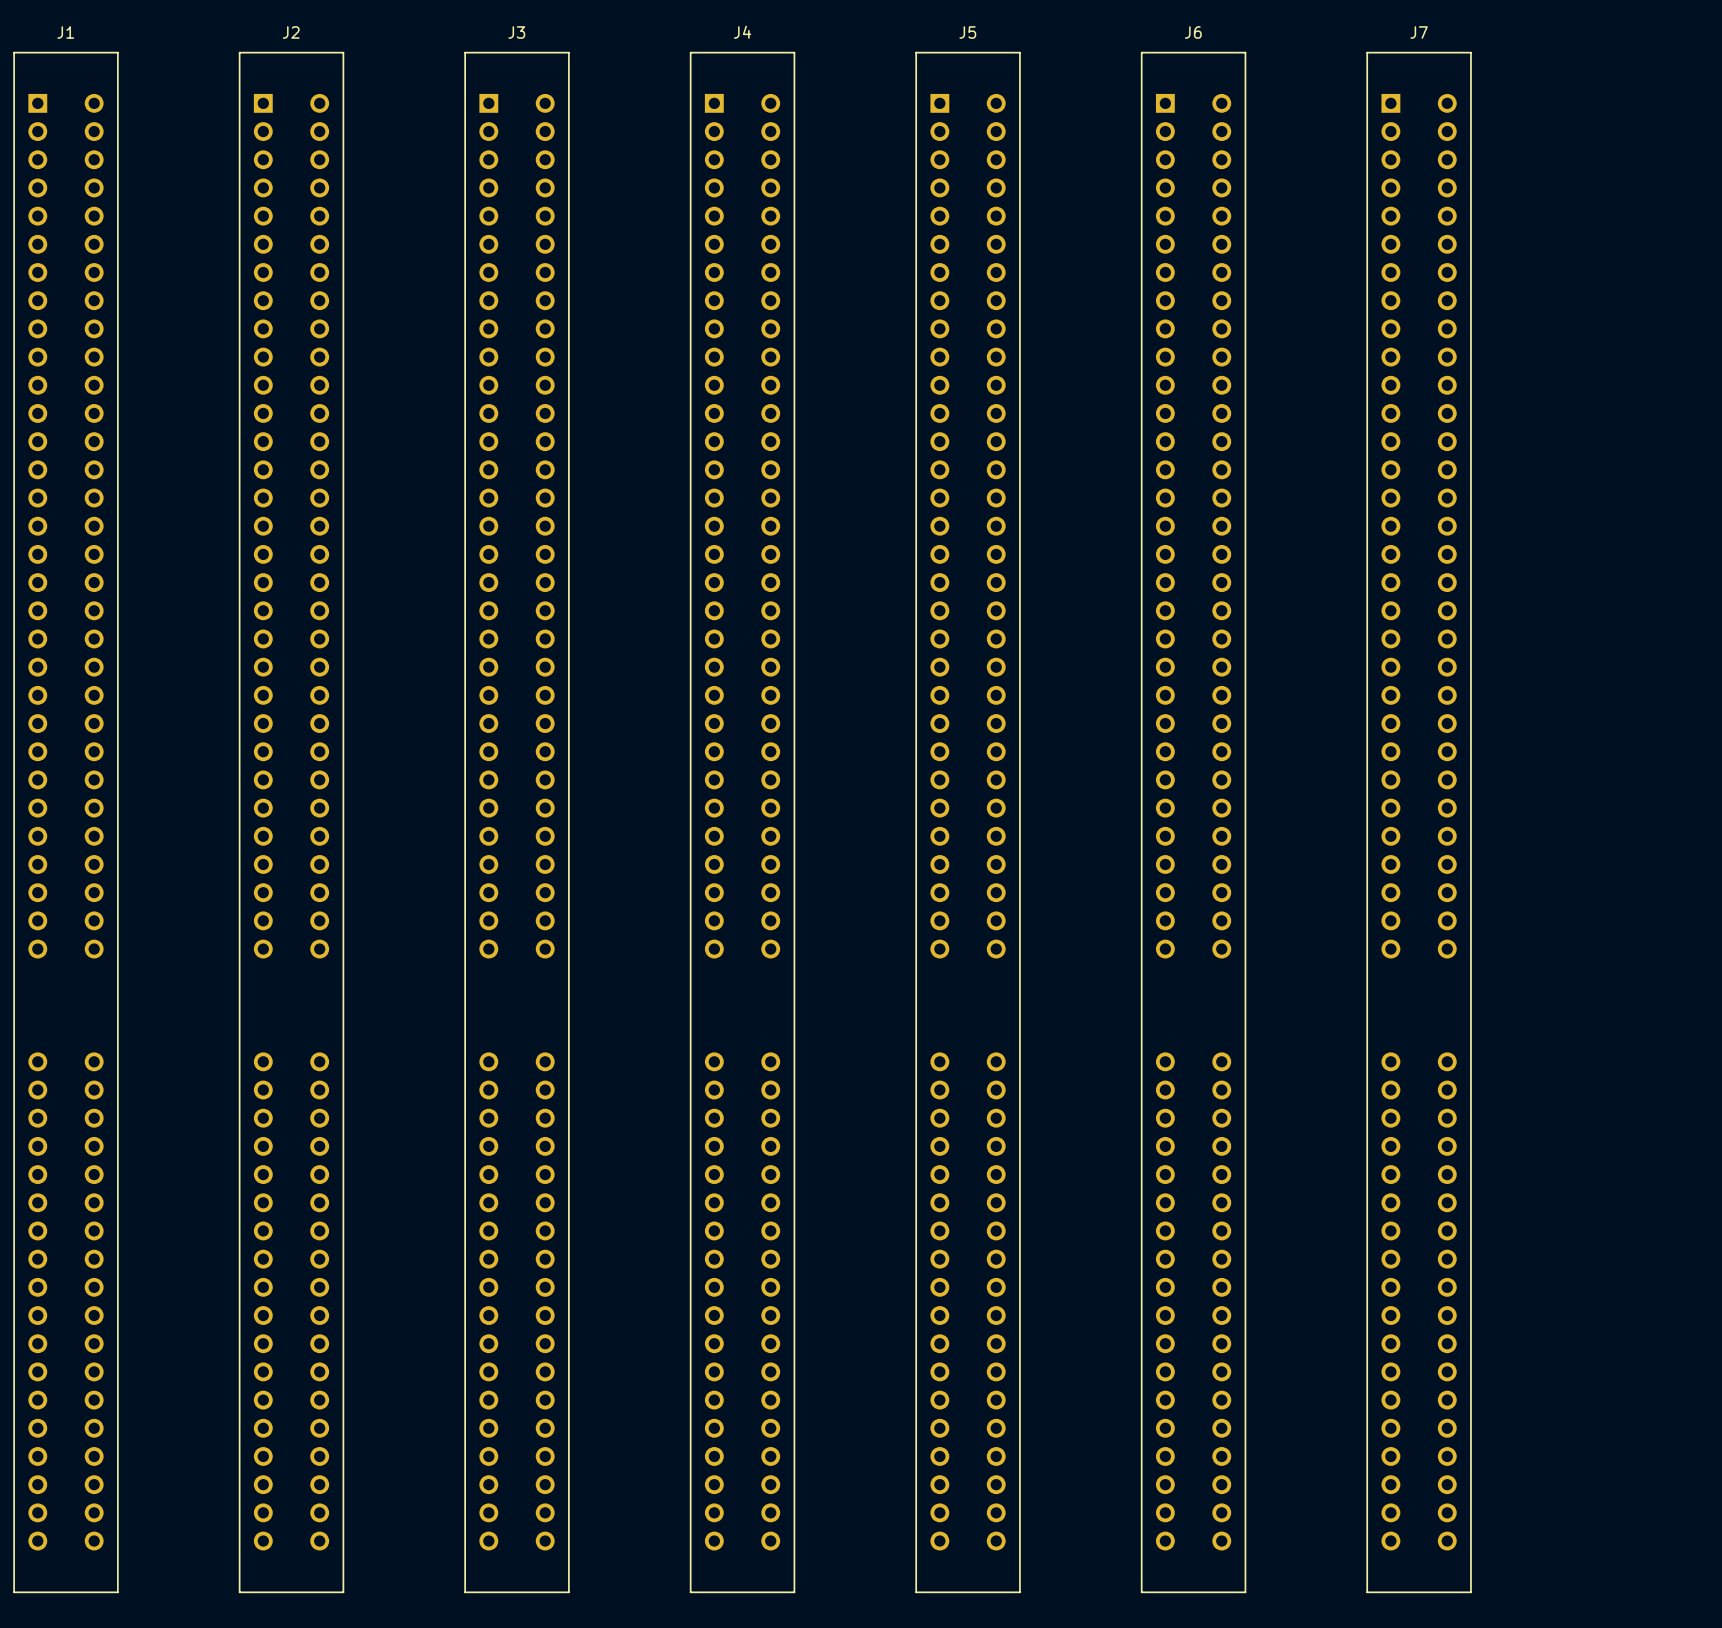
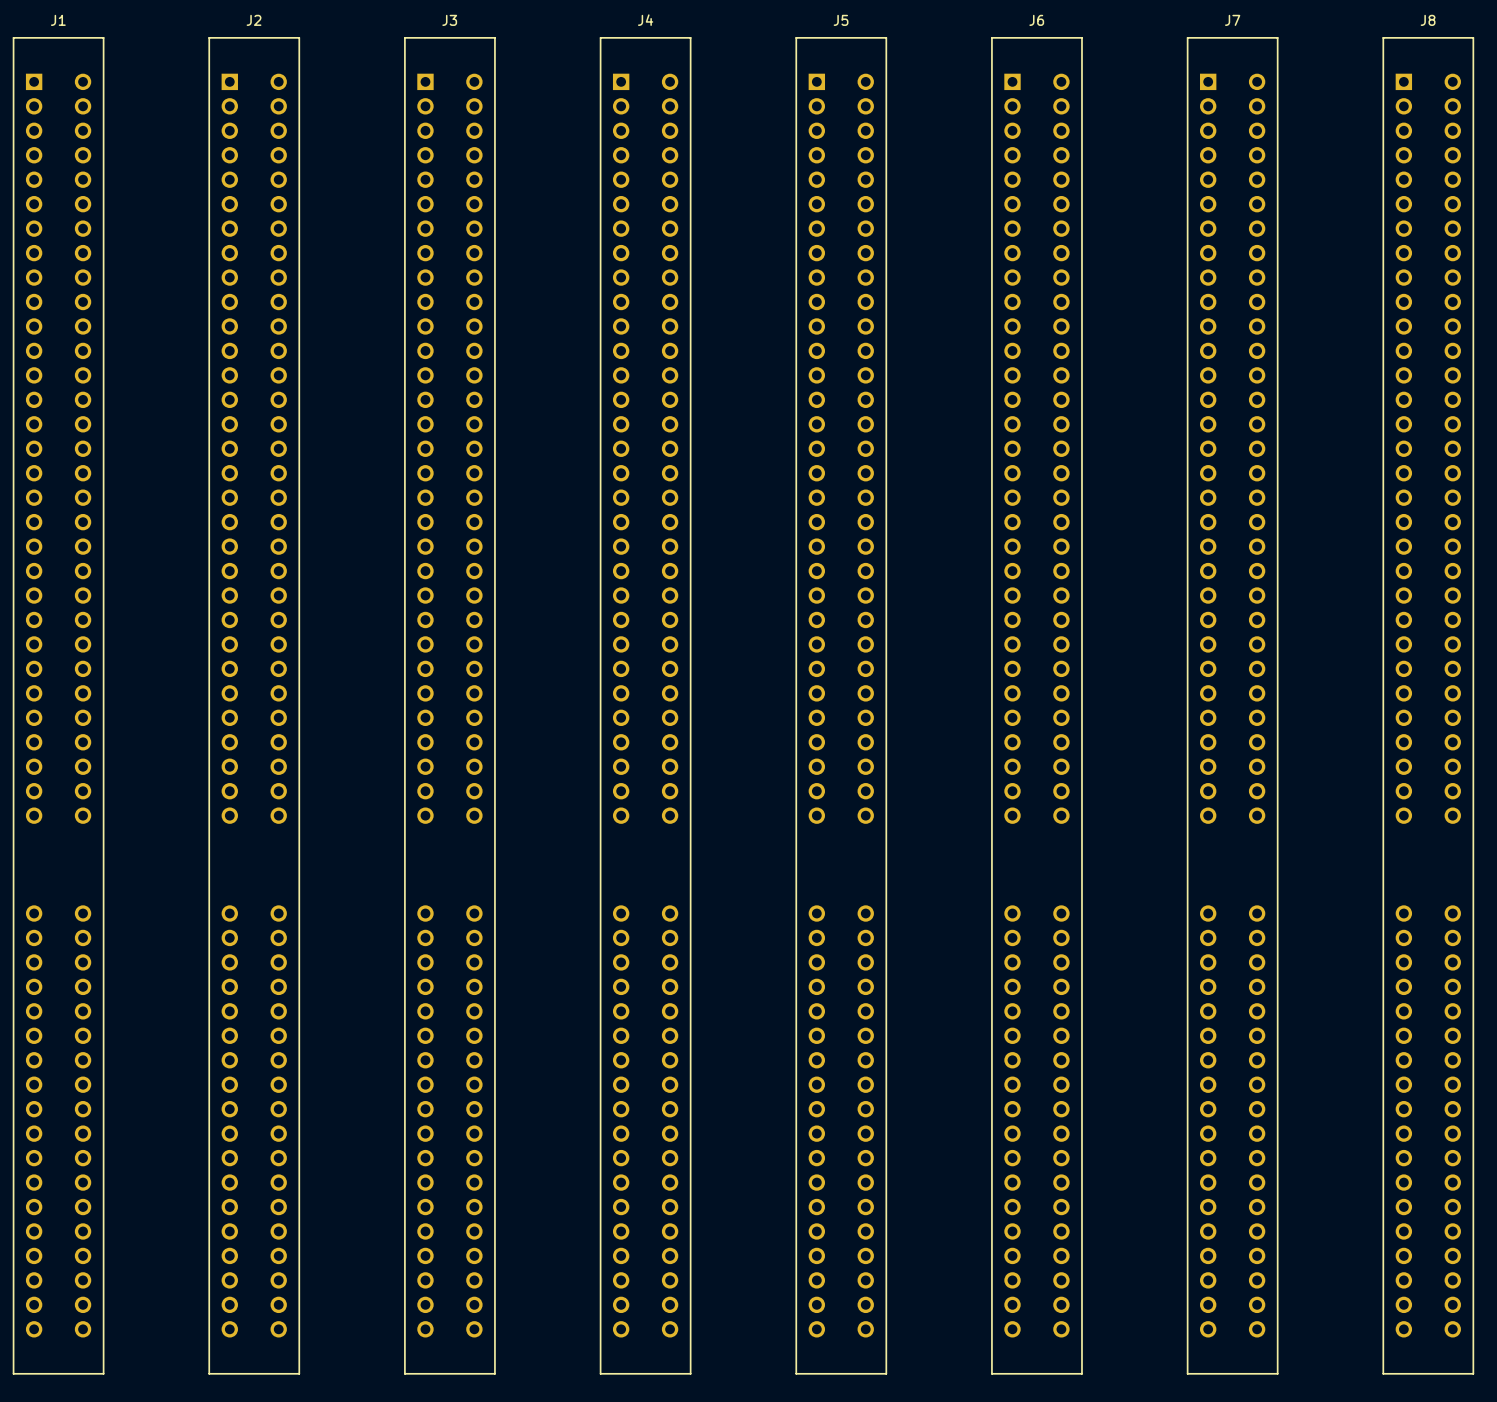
J8: none -> (1428, 705)

